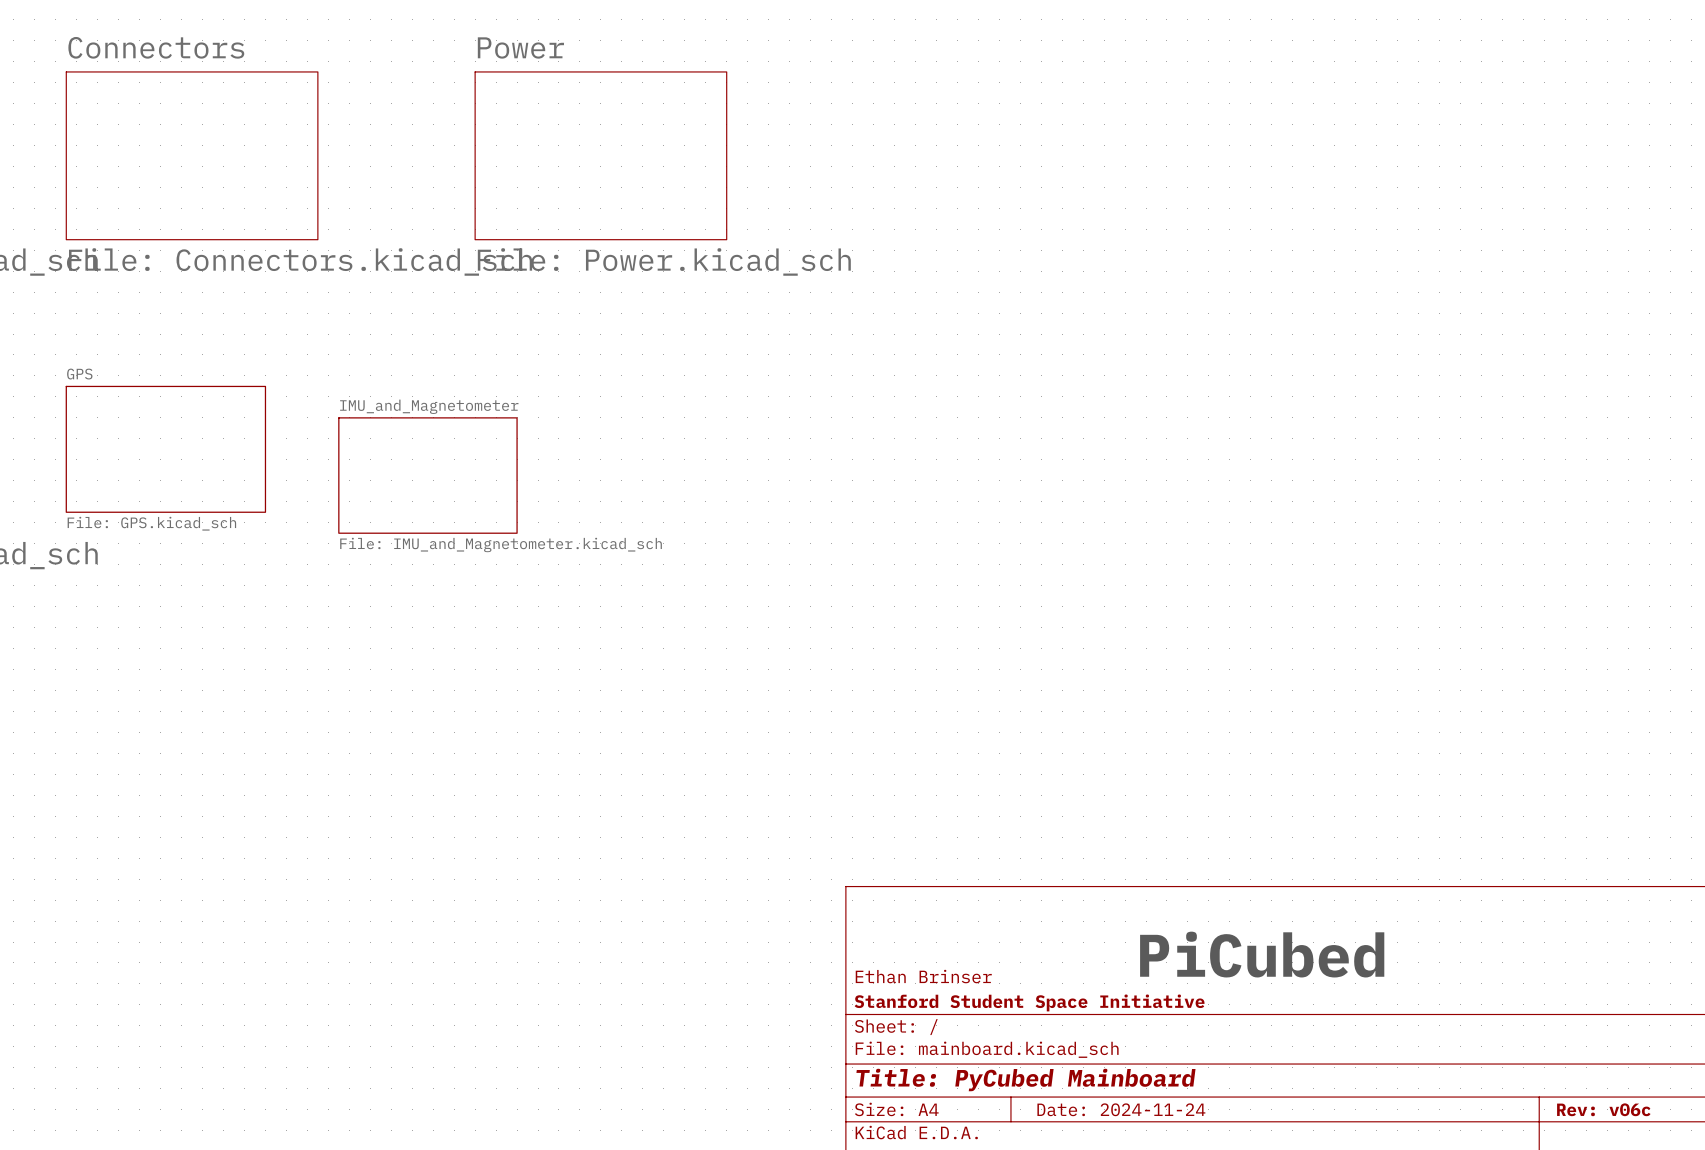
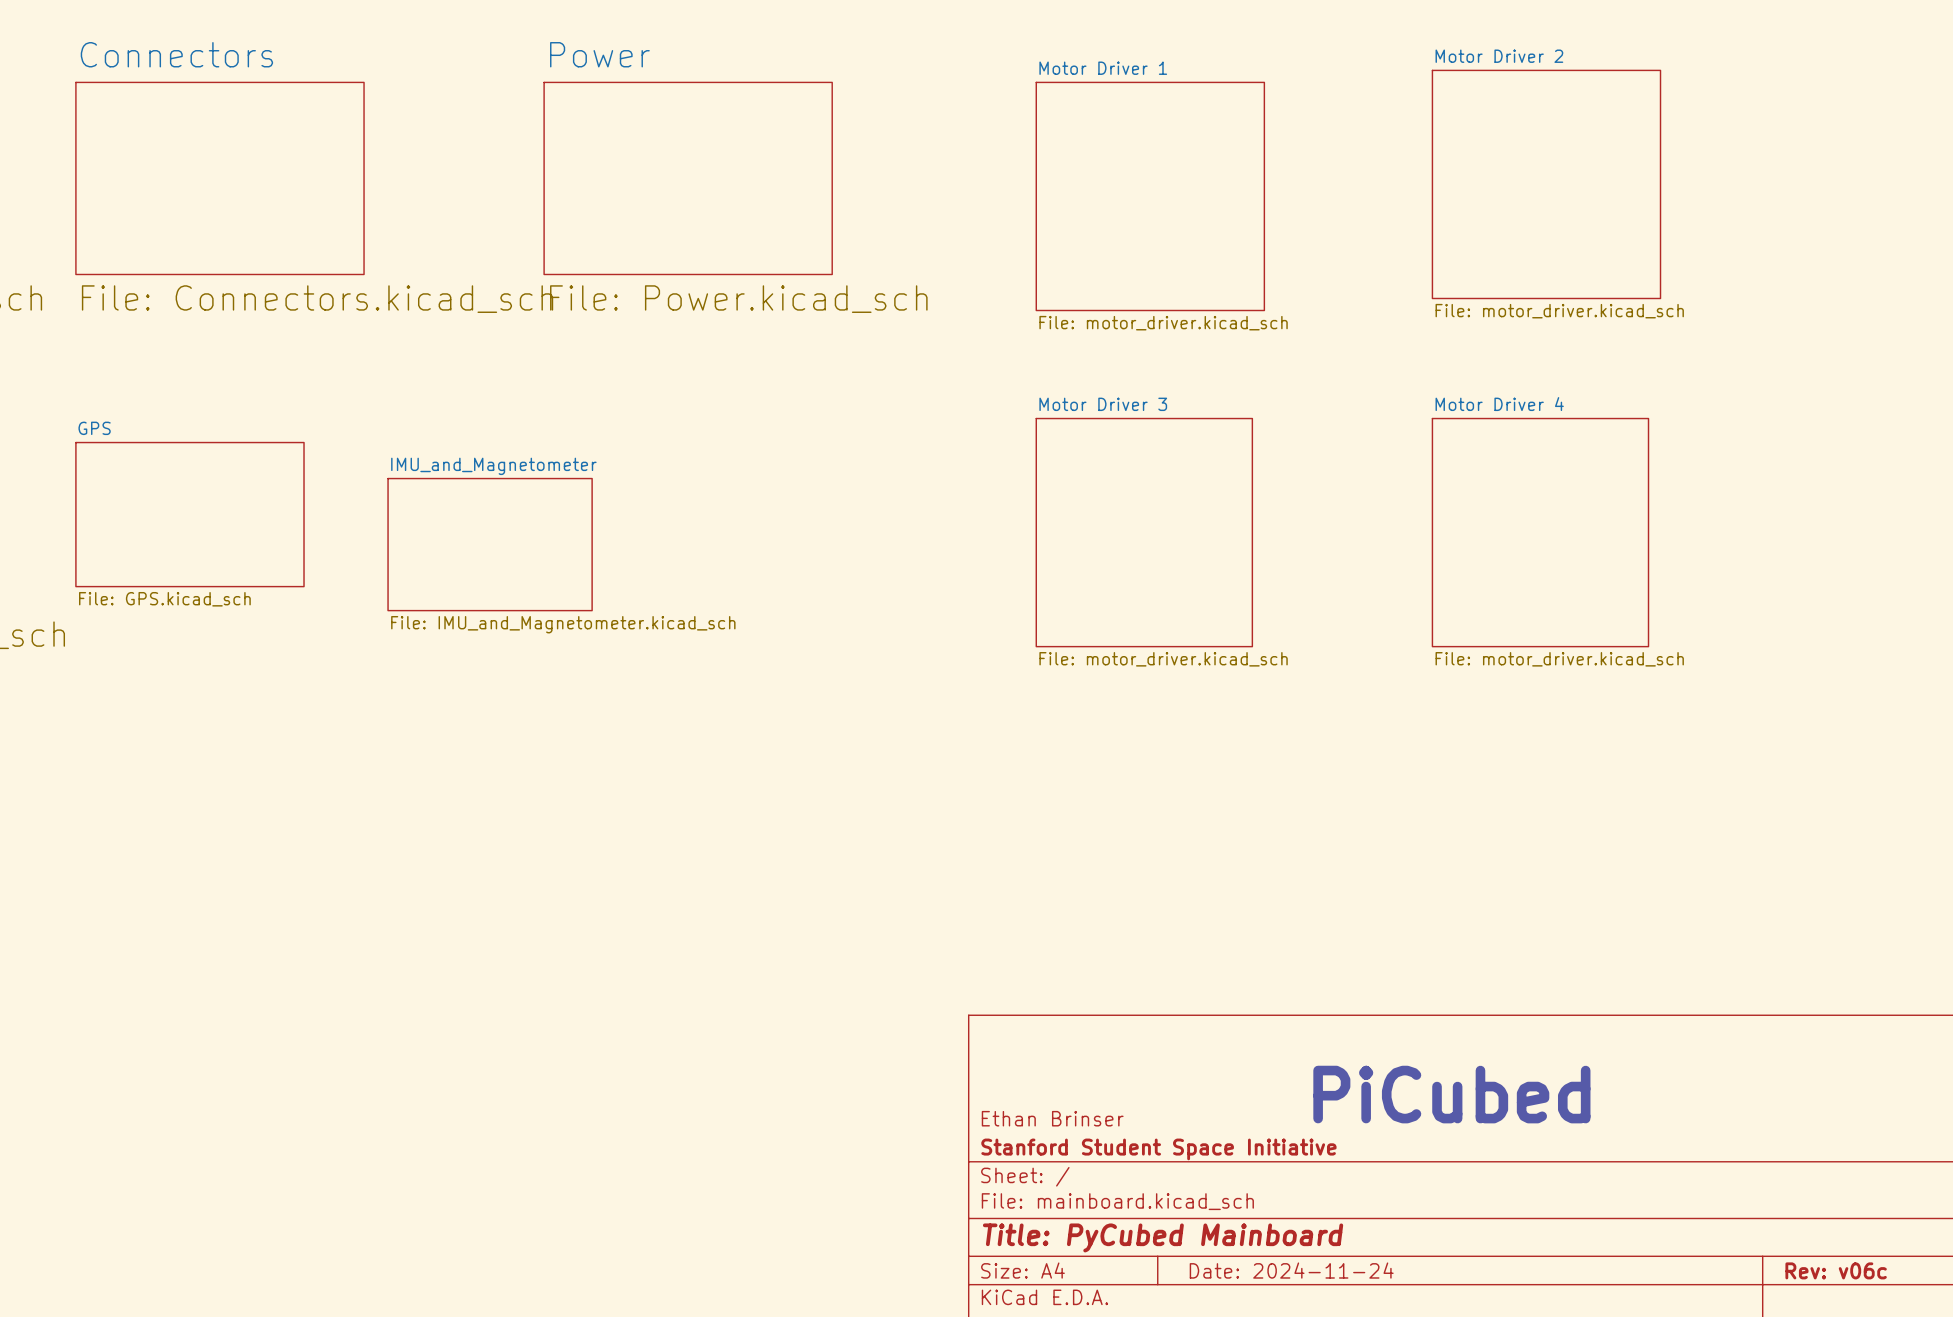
sheet Motor Driver 2: none -> File: motor_driver.kicad_sch (1546, 184)
sheet Motor Driver 1: none -> File: motor_driver.kicad_sch (1150, 196)
sheet Motor Driver 3: none -> File: motor_driver.kicad_sch (1144, 532)
sheet Motor Driver 4: none -> File: motor_driver.kicad_sch (1540, 532)

